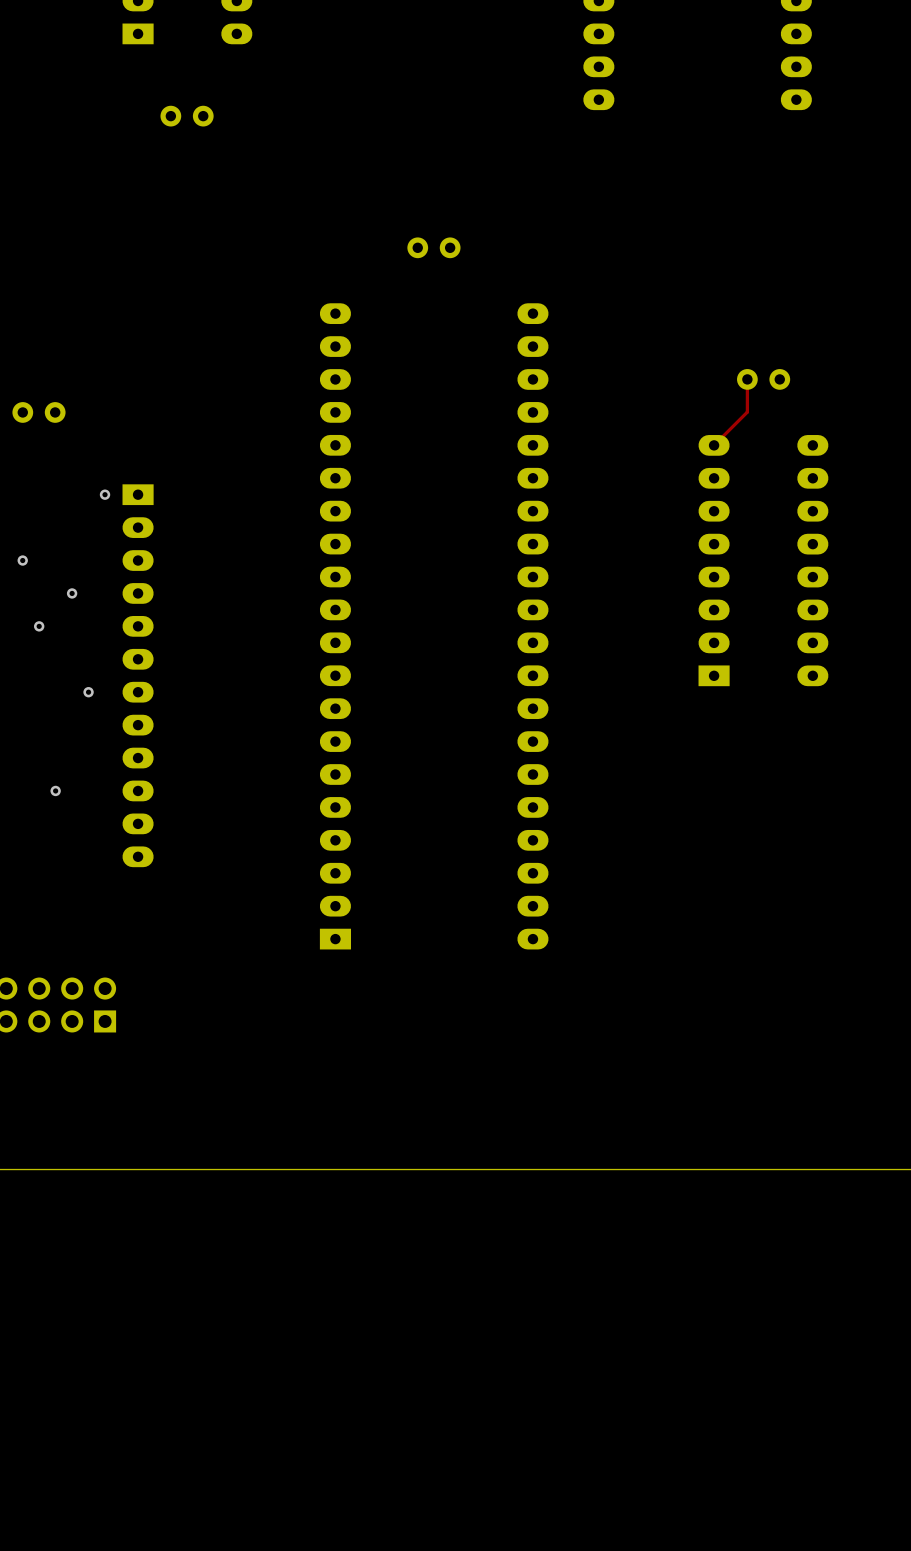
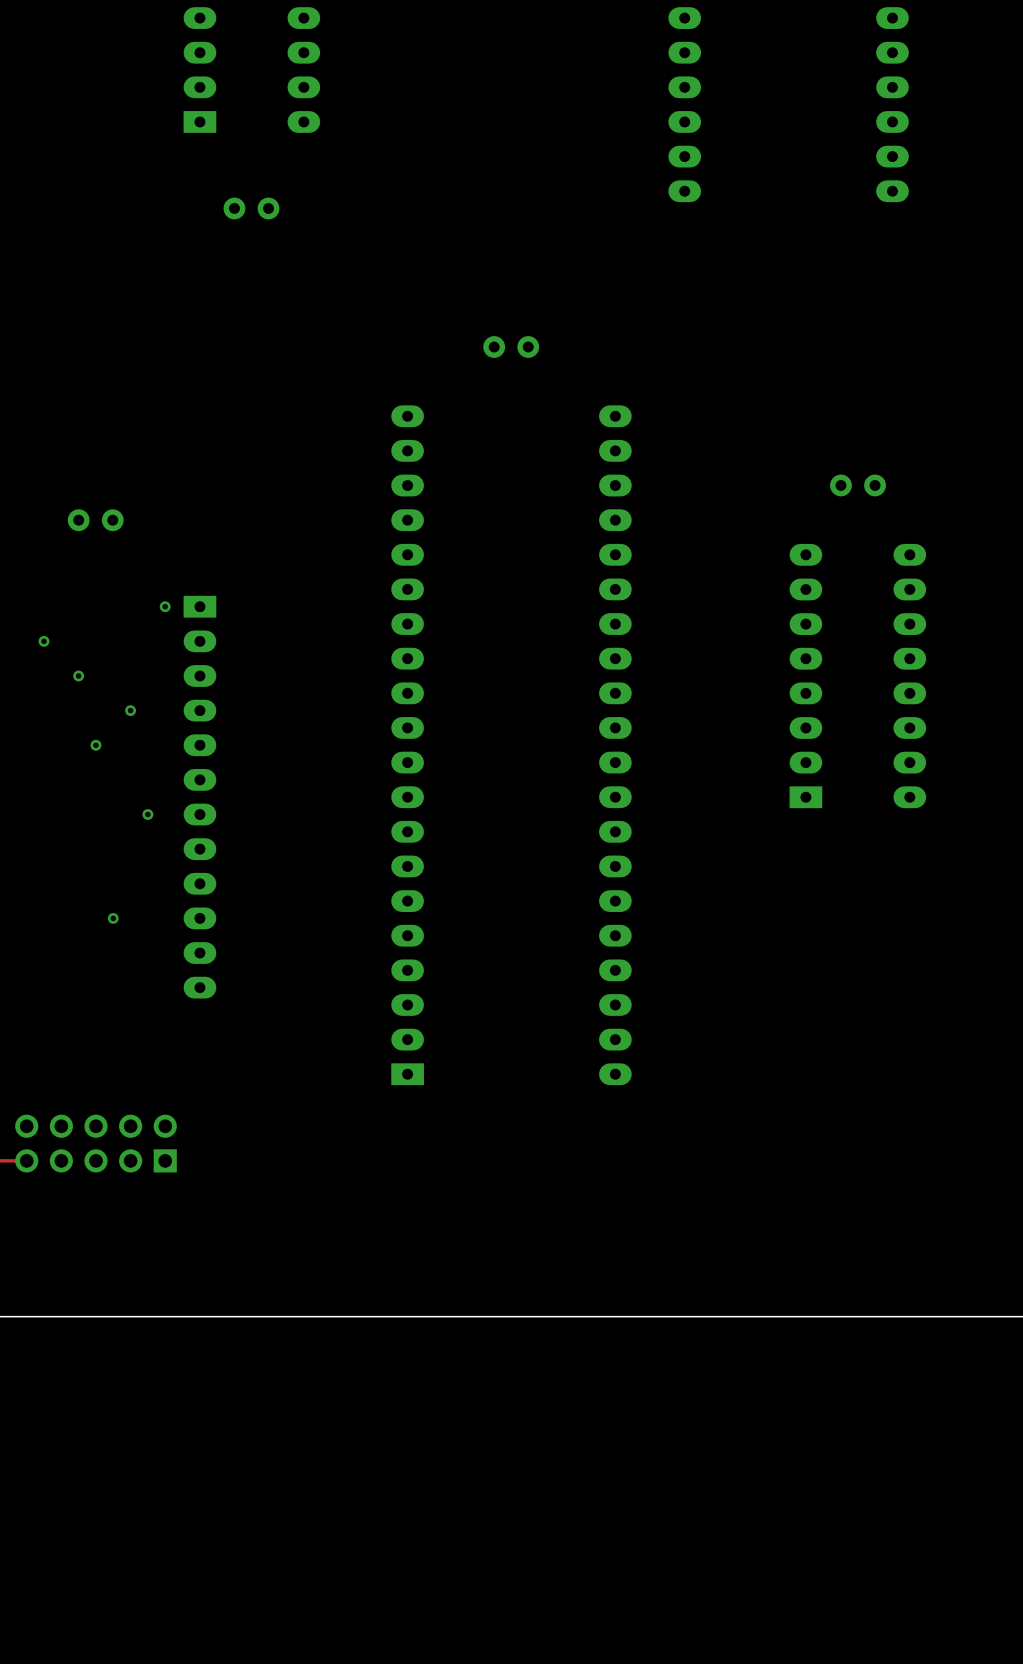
top track: (747, 379) (747, 412) (714, 445) -> none

